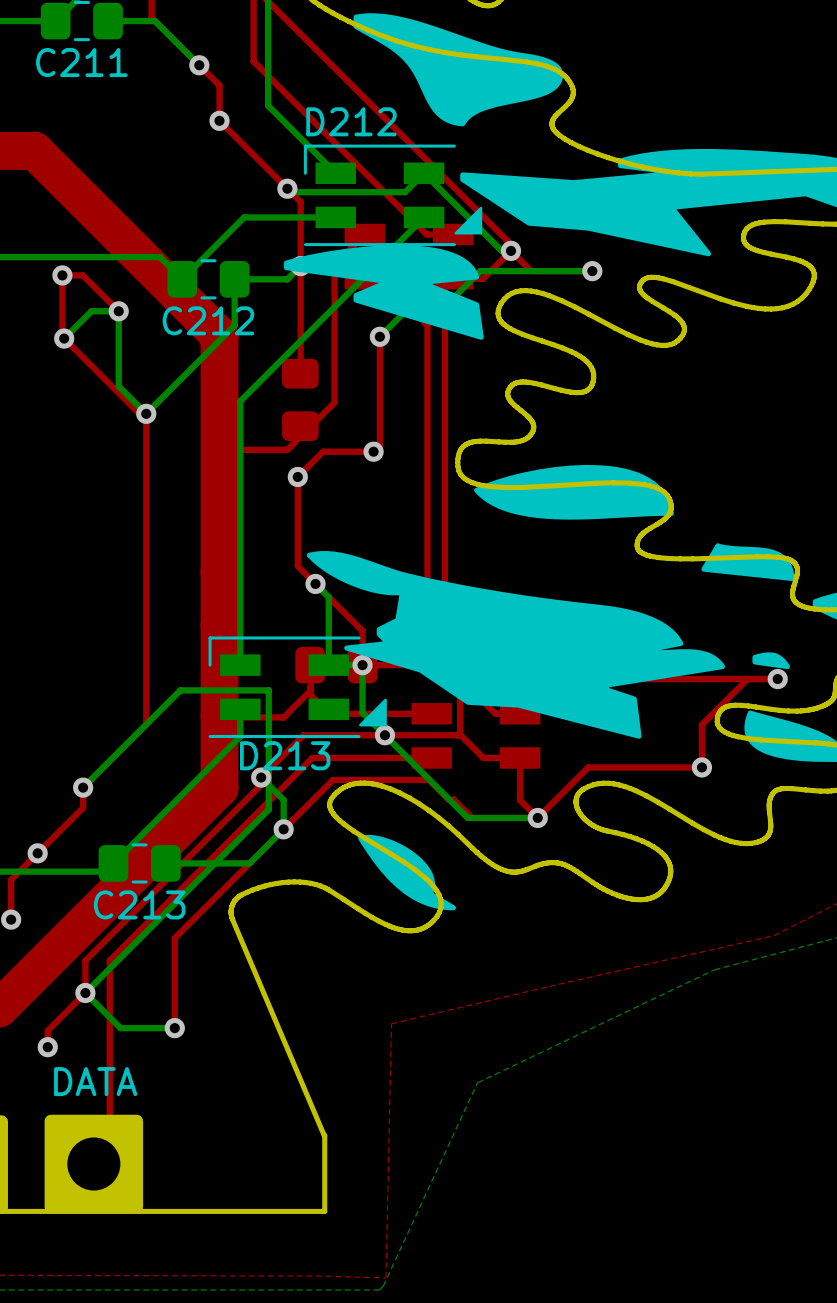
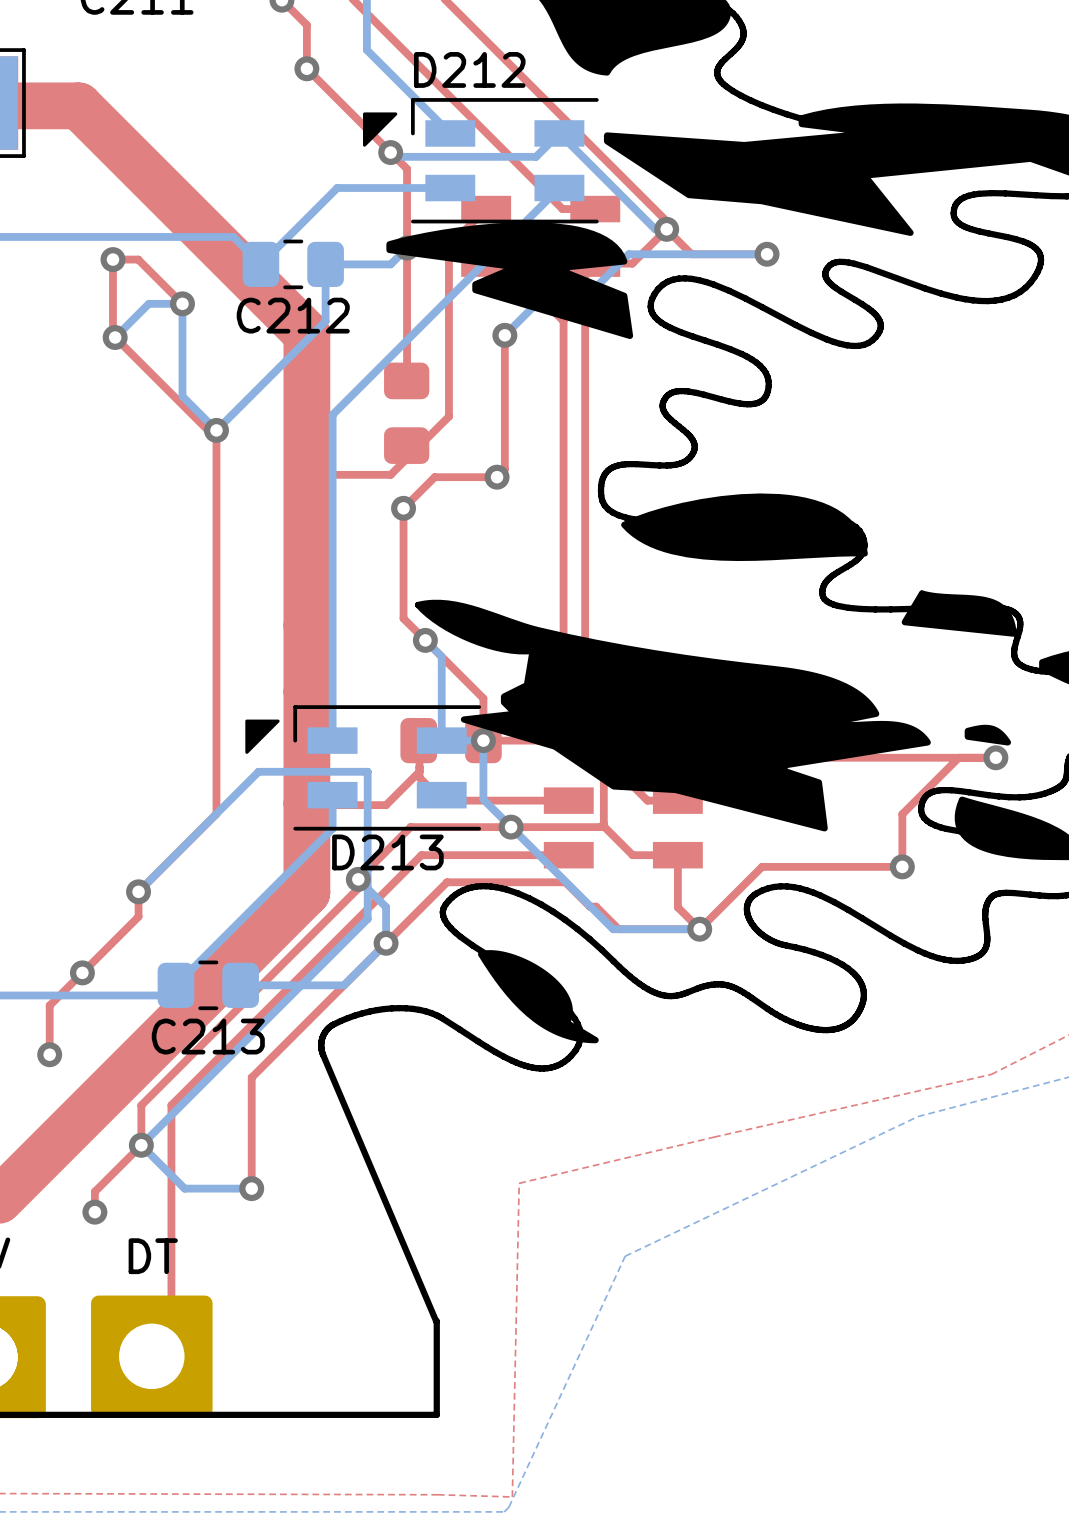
D212 footprint: [303, 144, 483, 247] -> [363, 98, 599, 224]
D213 footprint: [208, 636, 387, 739] -> [245, 705, 482, 831]
text: DATA (95, 1081) -> DT (153, 1256)

